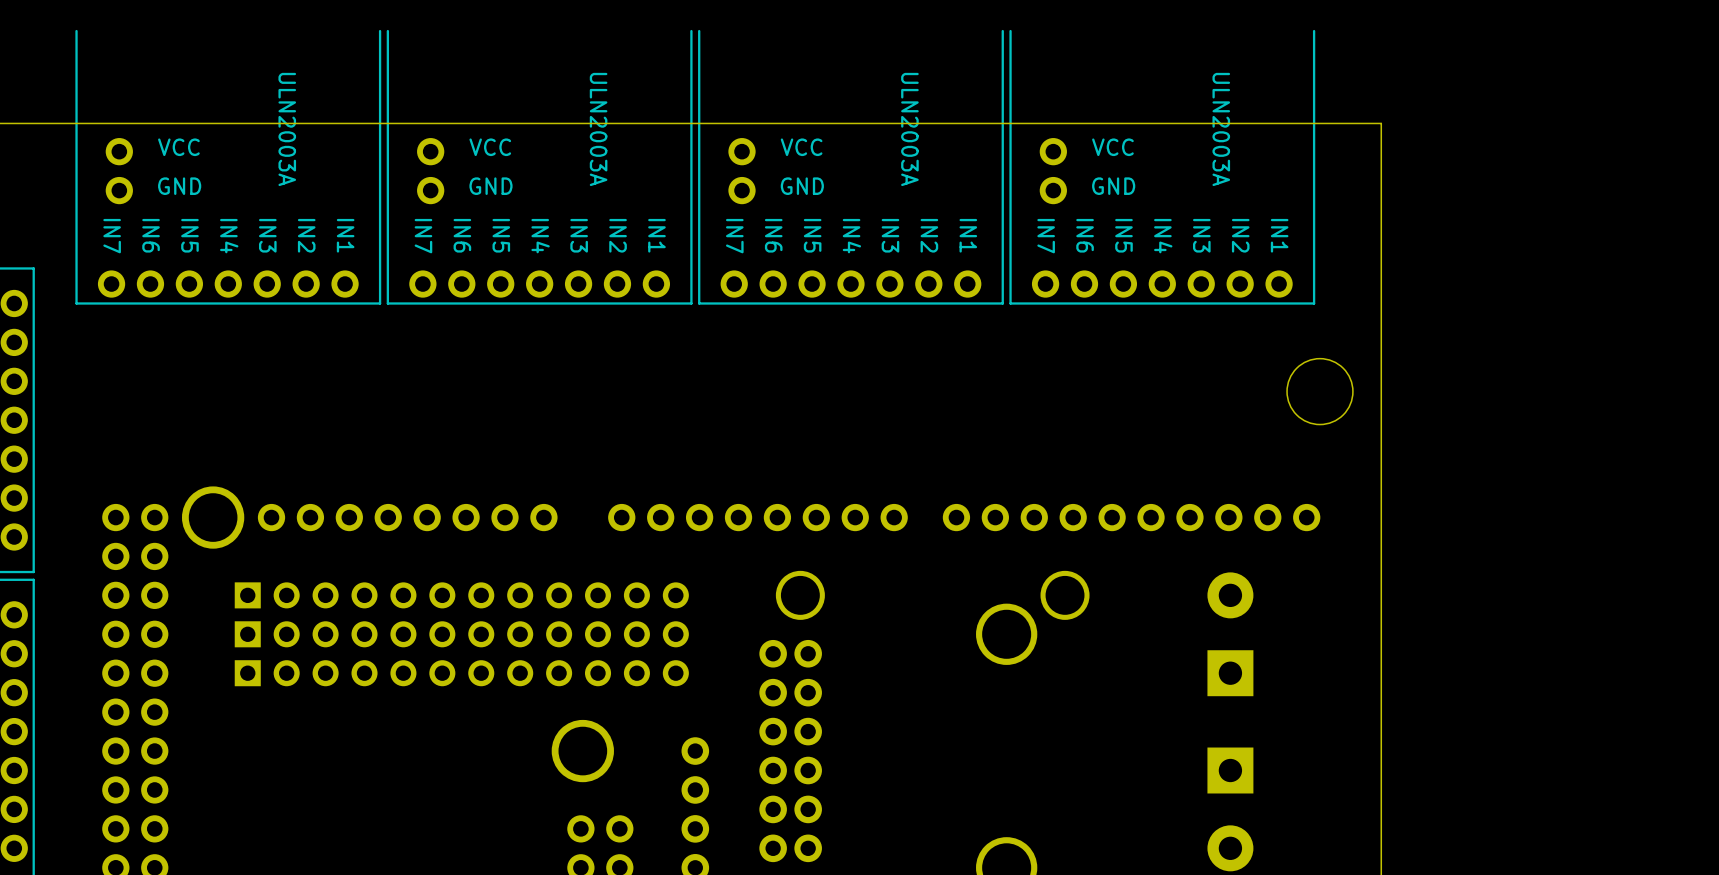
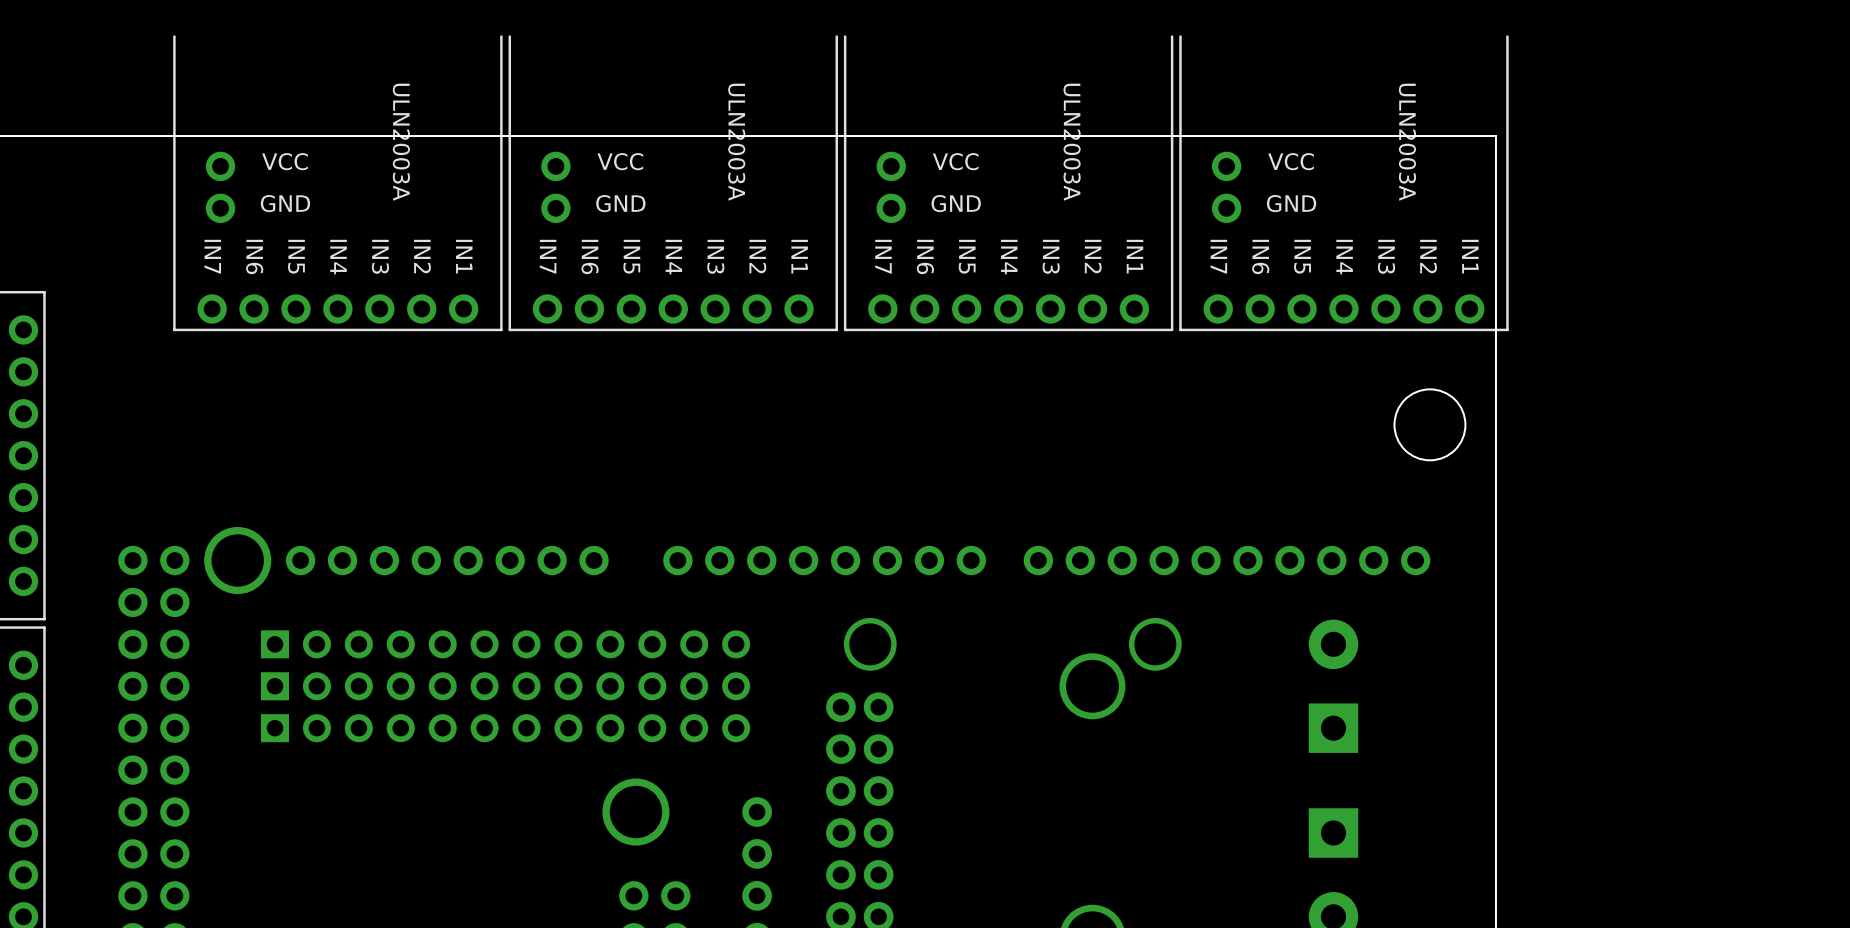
part position: (228, 167) -> (337, 183)
part position: (539, 167) -> (673, 183)
part position: (850, 167) -> (1008, 183)
part position: (1162, 167) -> (1343, 183)

